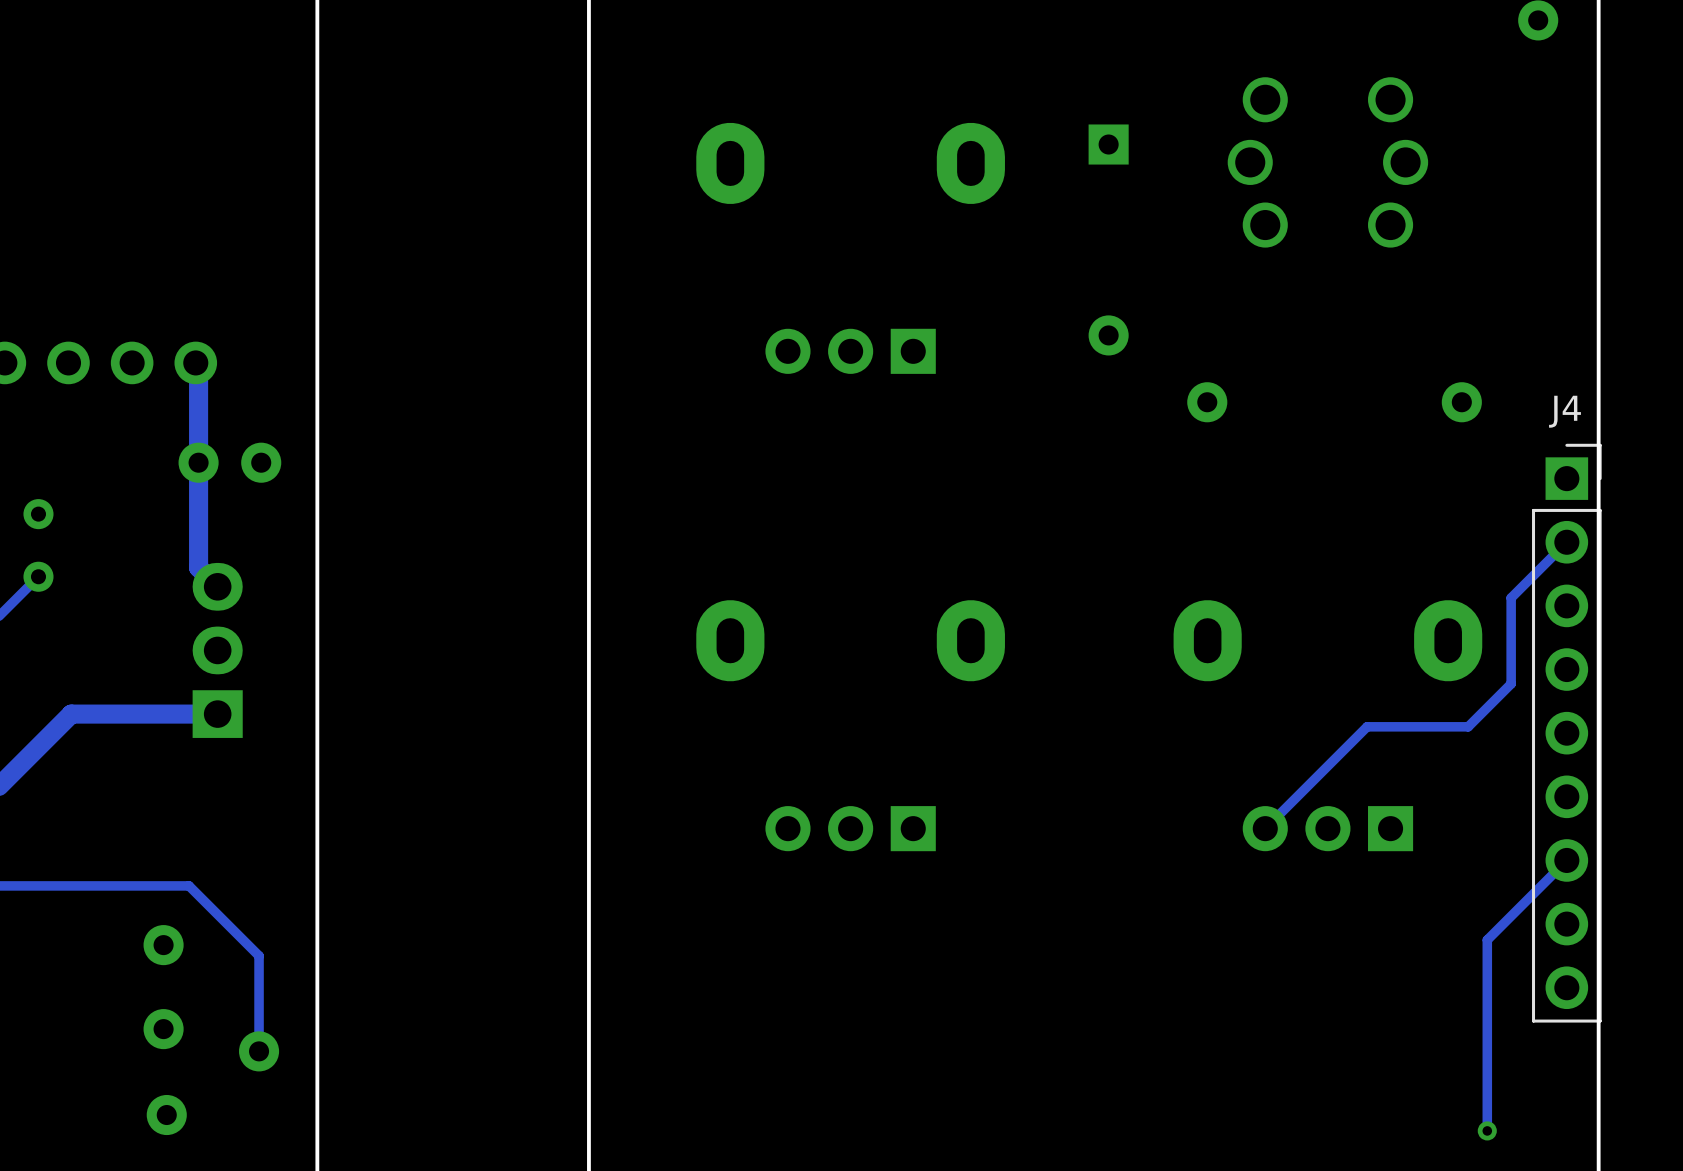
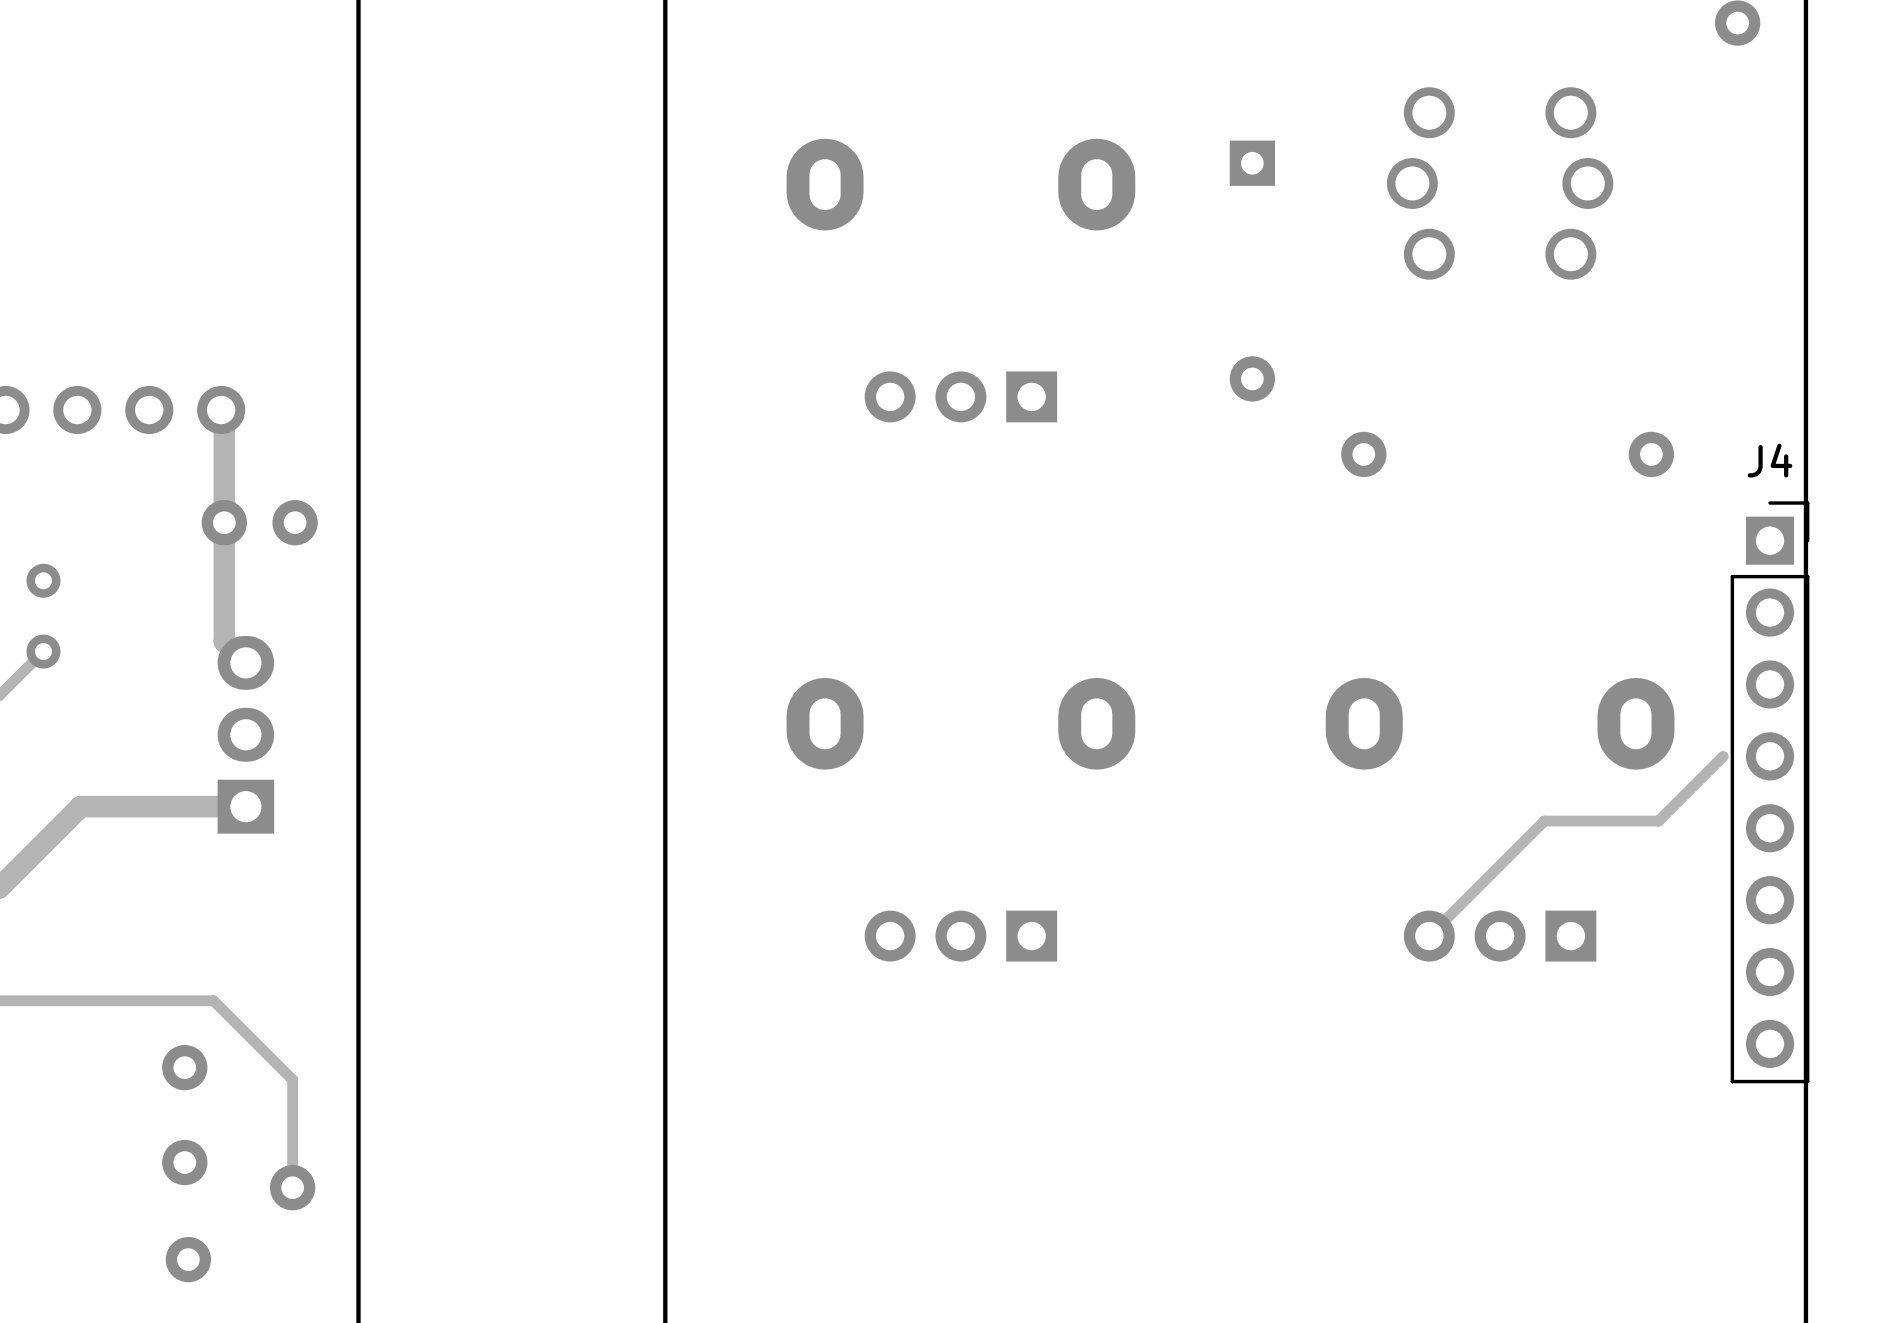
J4 footprint: [1532, 443, 1602, 1023] -> [1730, 501, 1810, 1084]
track: (1566, 542) (1511, 597) (1511, 683) -> (1723, 756) (1707, 772)
track: (1566, 860) (1487, 940) (1487, 1130) -> none
via: (1487, 1130) -> none

